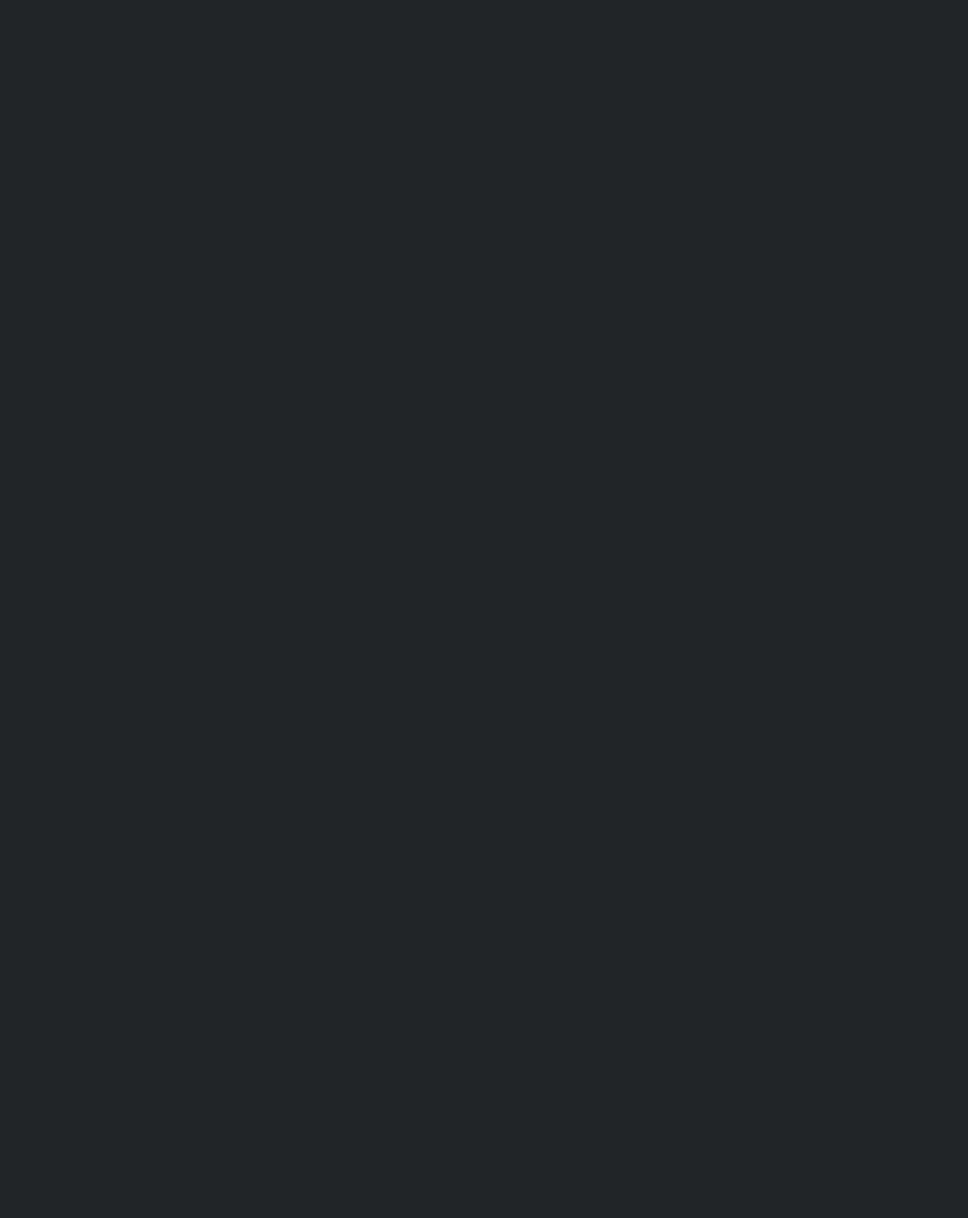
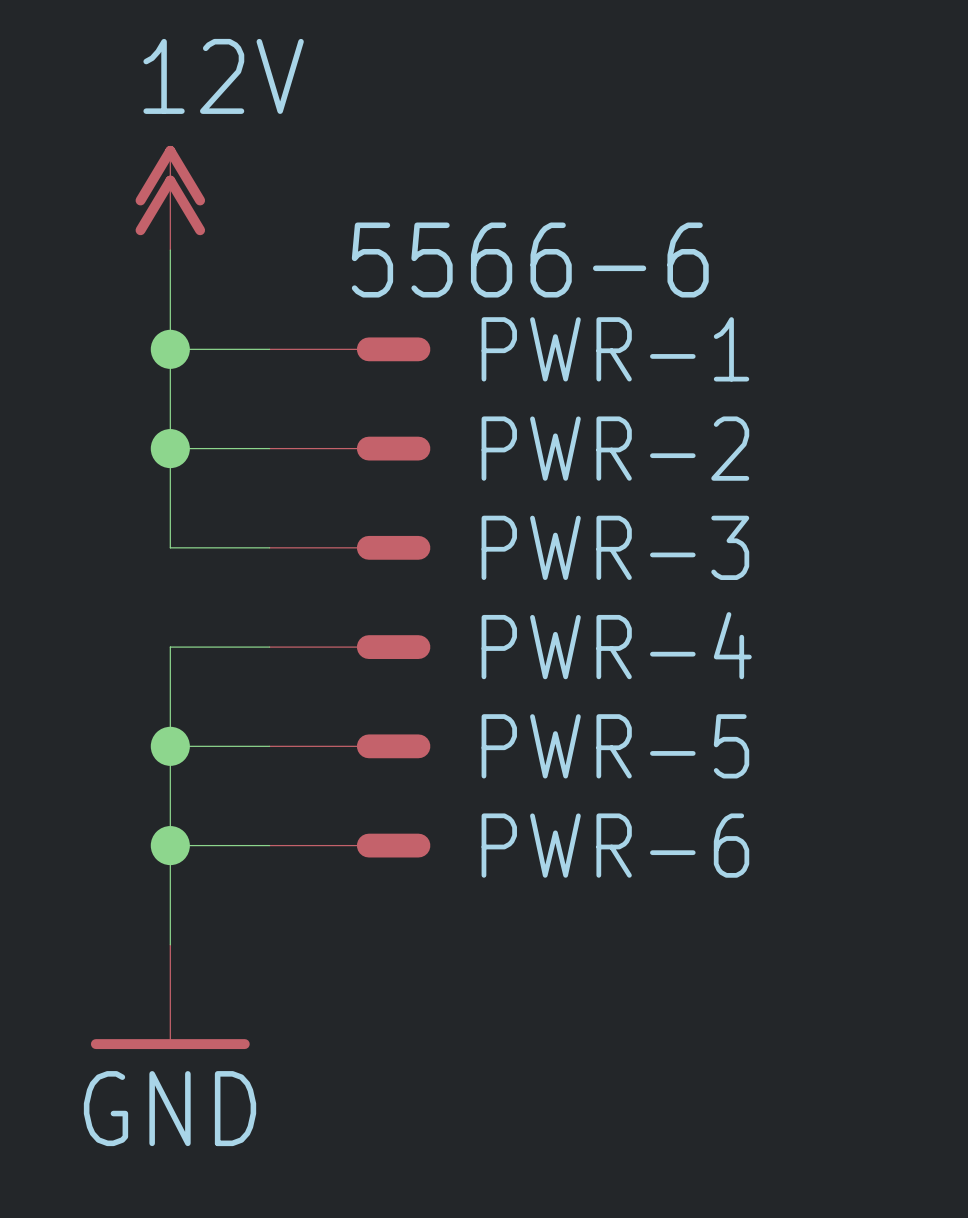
power symbol: none -> 12V (170, 197)
wire: none -> (170, 250) (170, 547) (269, 547)
wire: none -> (170, 349) (269, 349)
junction: none -> (170, 349)
PWR-1: none -> 5566-6 (349, 349)
wire: none -> (170, 448) (269, 448)
junction: none -> (170, 448)
PWR-2: none -> (349, 448)
PWR-3: none -> (349, 547)
wire: none -> (269, 647) (170, 647) (170, 944)
PWR-4: none -> (349, 647)
wire: none -> (170, 746) (269, 746)
junction: none -> (170, 746)
PWR-5: none -> (349, 746)
wire: none -> (170, 845) (269, 845)
junction: none -> (170, 845)
PWR-6: none -> (349, 845)
power symbol: none -> GND (170, 996)

